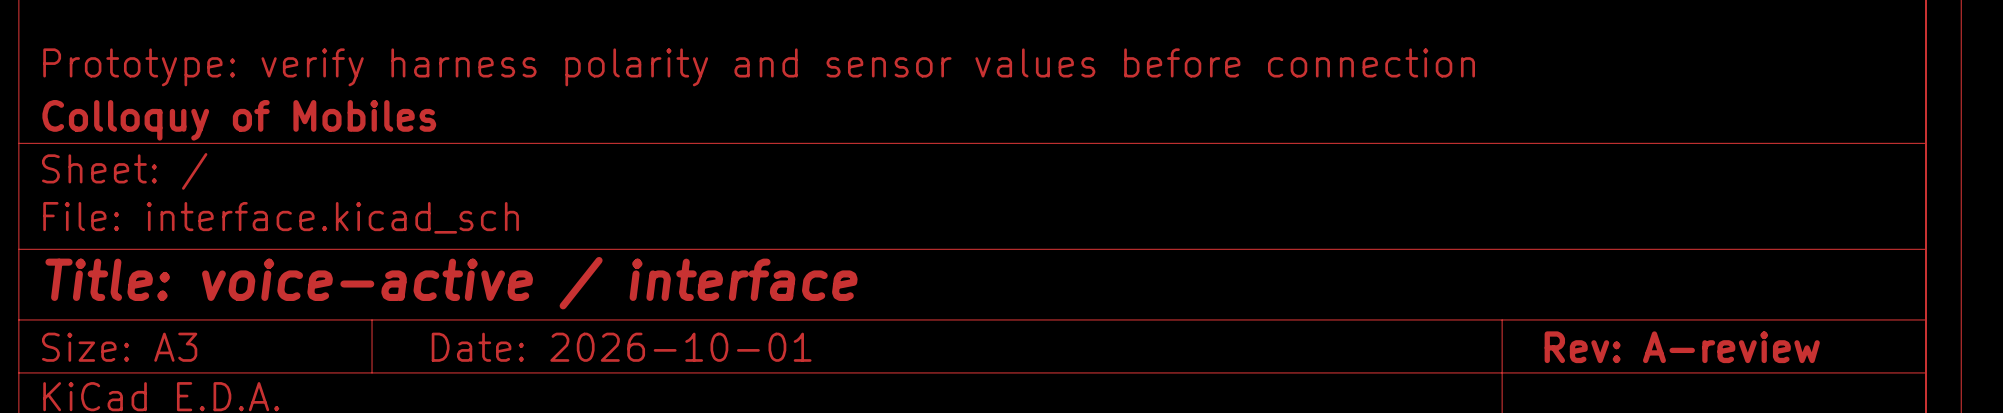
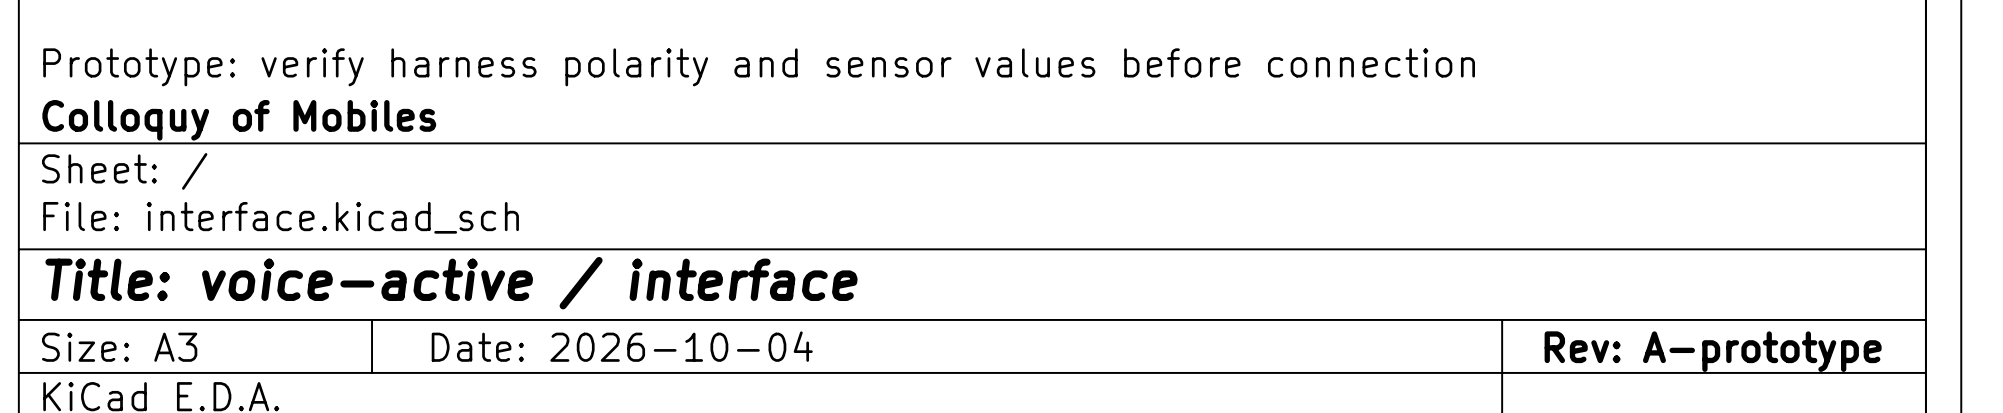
title block: Date: 2026-10-01 (621, 347) -> Date: 2026-10-04 (622, 346)
title block: Rev: A-review (1682, 347) -> Rev: A-prototype (1713, 351)

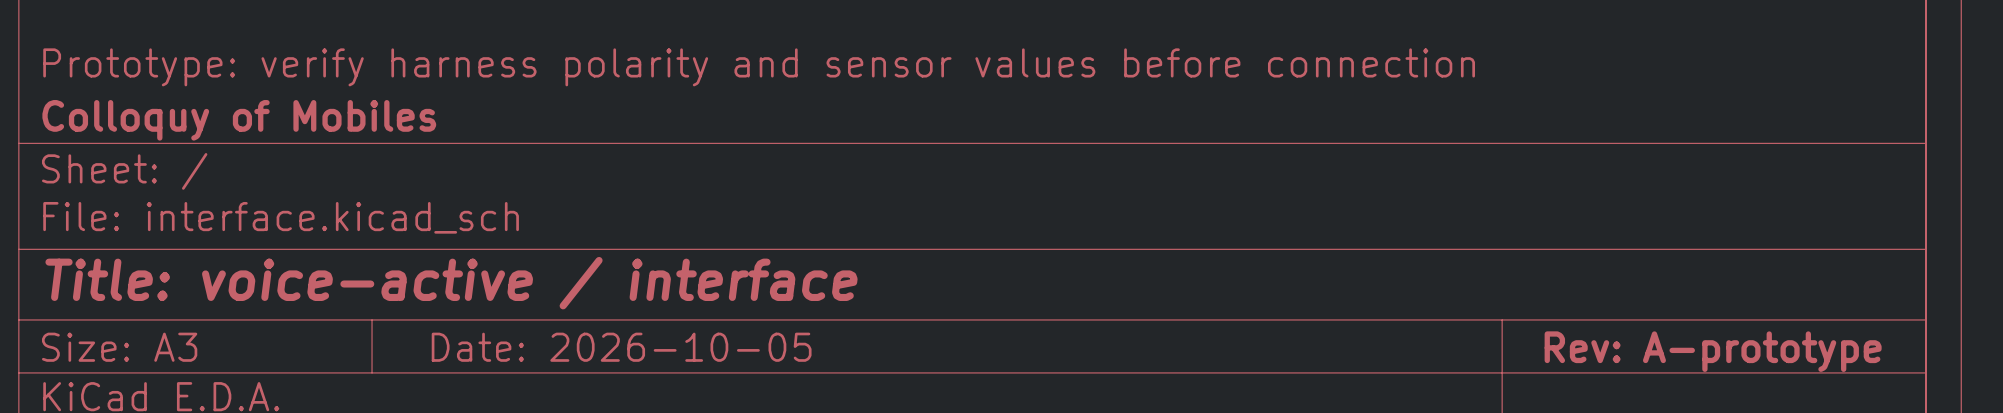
title block: Date: 2026-10-04 (622, 346) -> Date: 2026-10-05 (621, 347)

